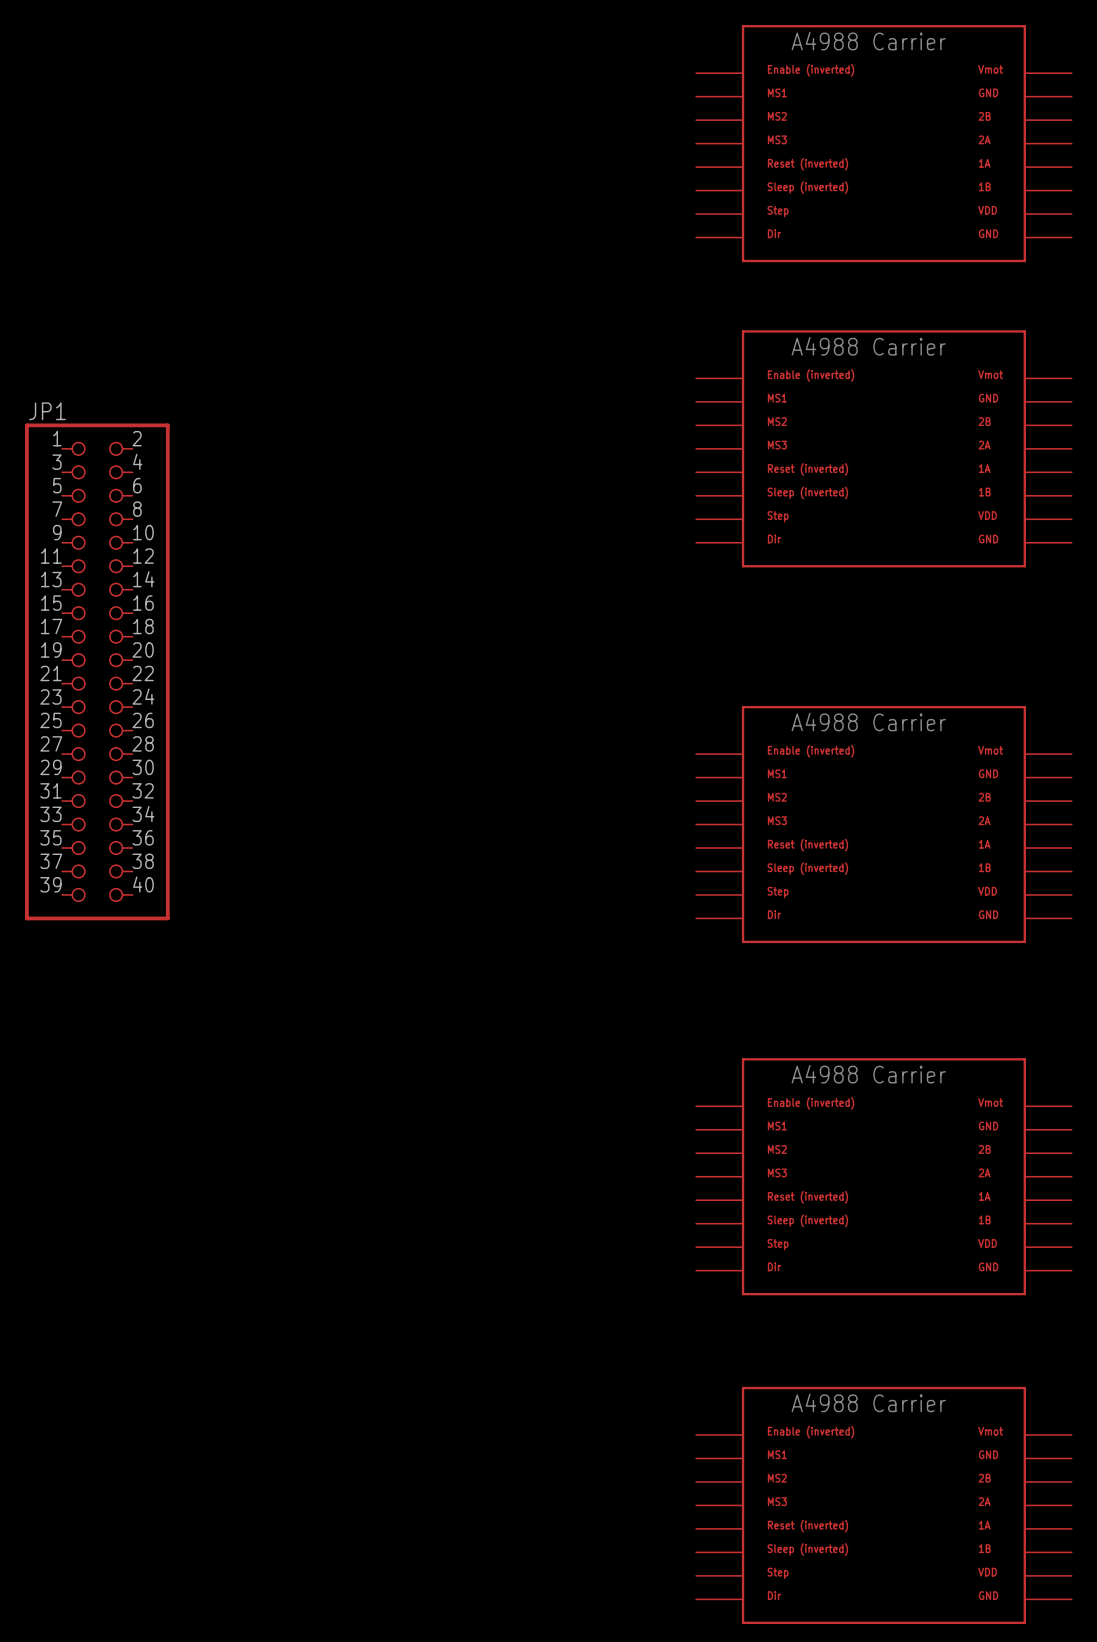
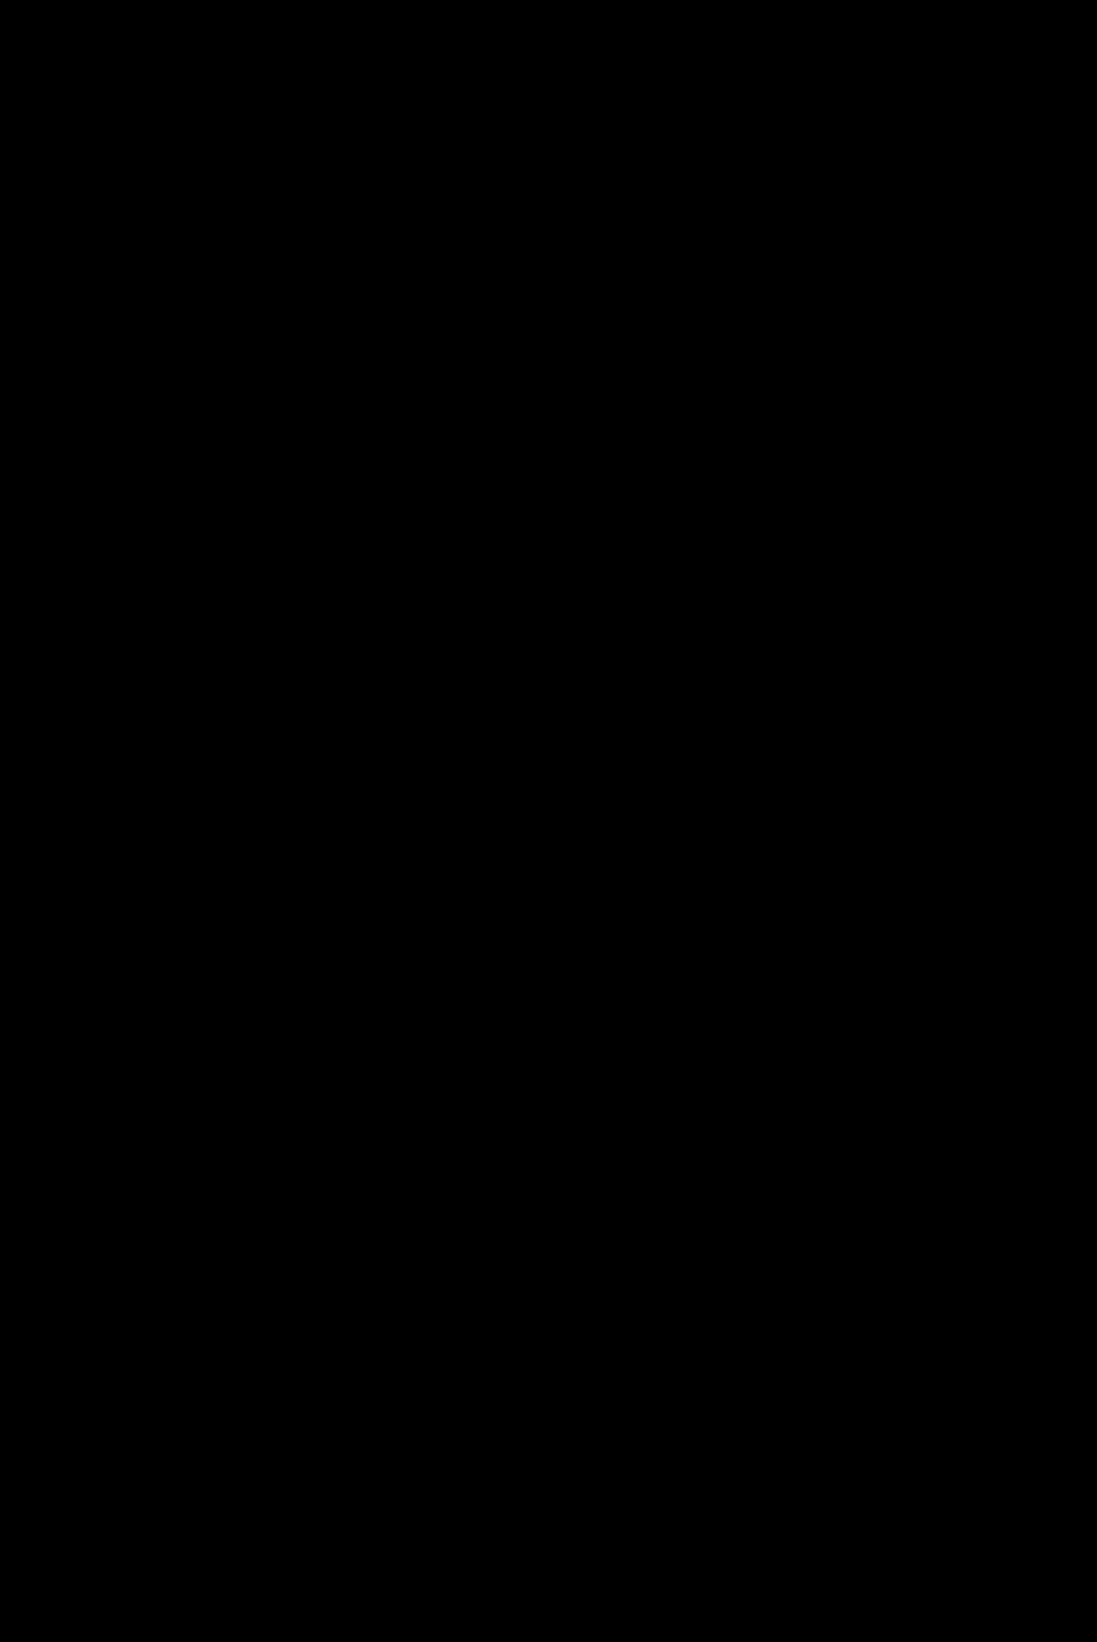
part: (883, 143) -> none
part: (883, 448) -> none
JP1: (97, 671) -> none
part: (883, 824) -> none
part: (883, 1176) -> none
part: (883, 1505) -> none

